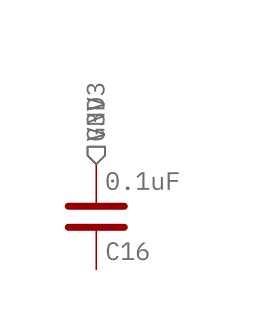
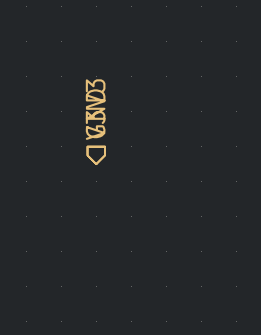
C16: 0.1uF (96, 216) -> none

